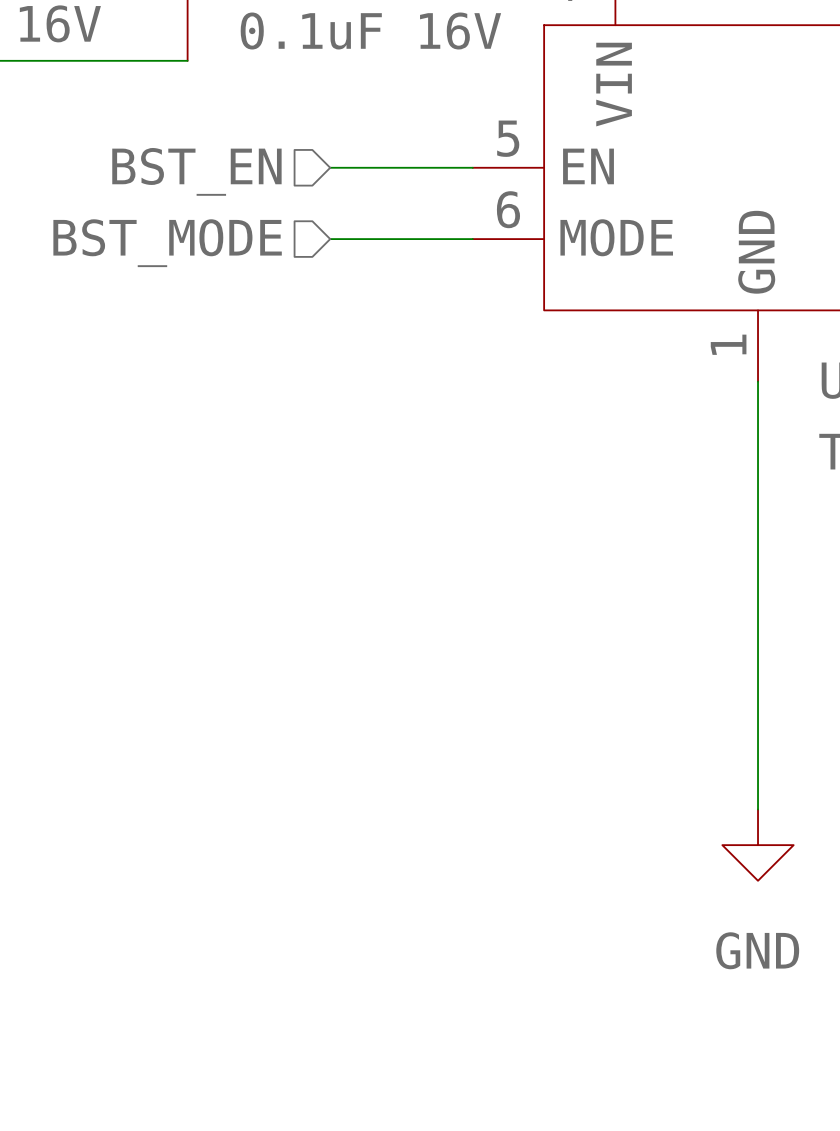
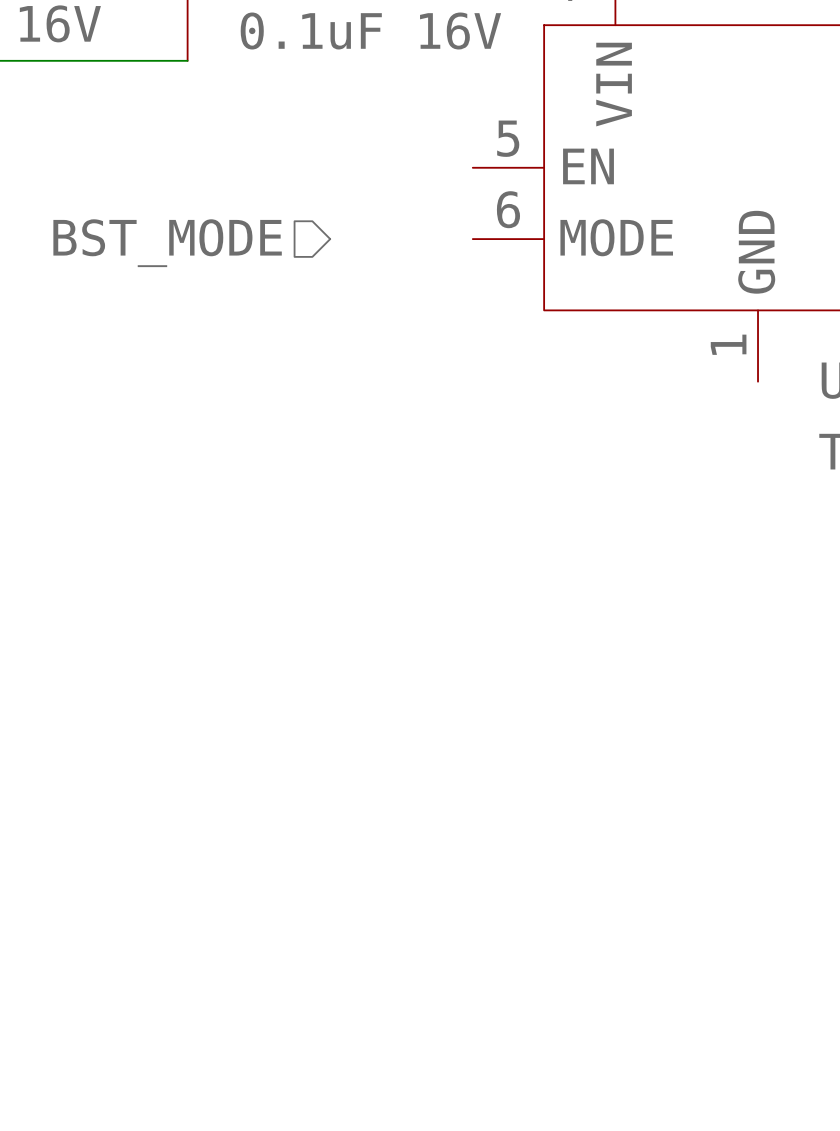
wire: (330, 167) (472, 167) -> none
hierarchical label: BST_EN (196, 171) -> none
wire: (330, 239) (472, 239) -> none
wire: (758, 381) (758, 809) -> none
power symbol: GND (758, 845) -> none

